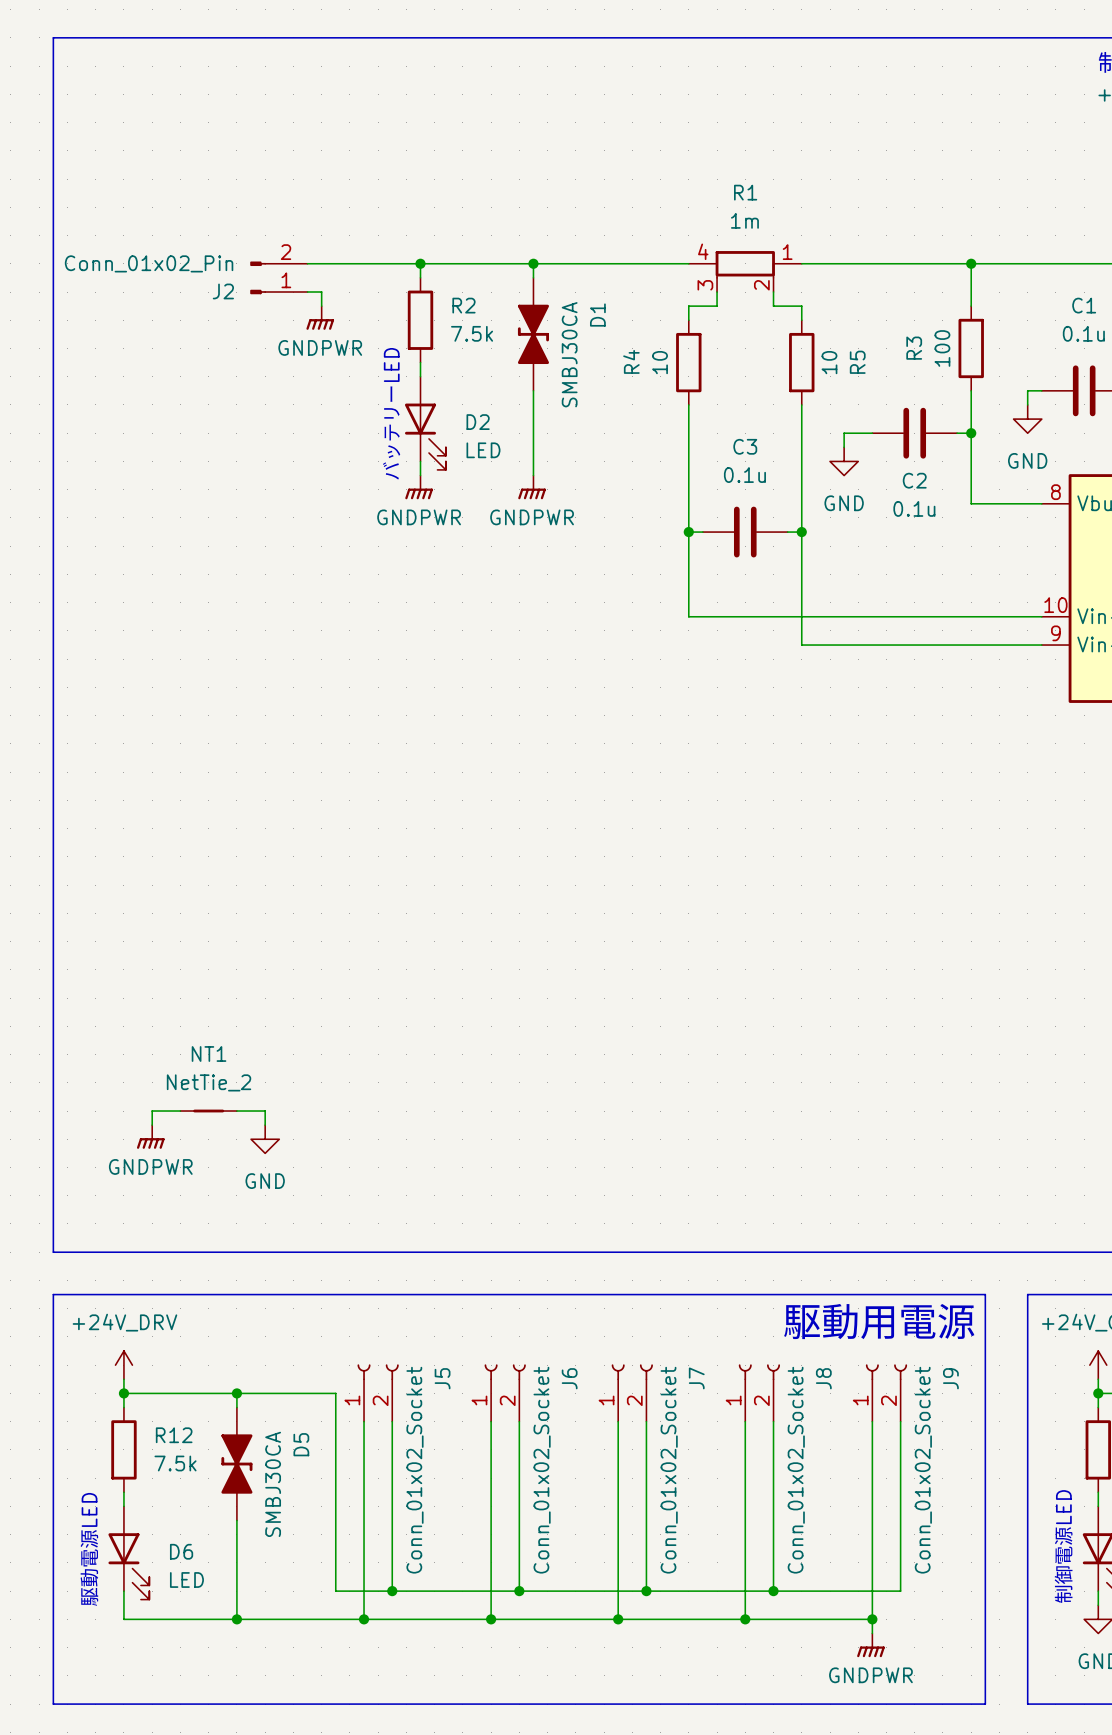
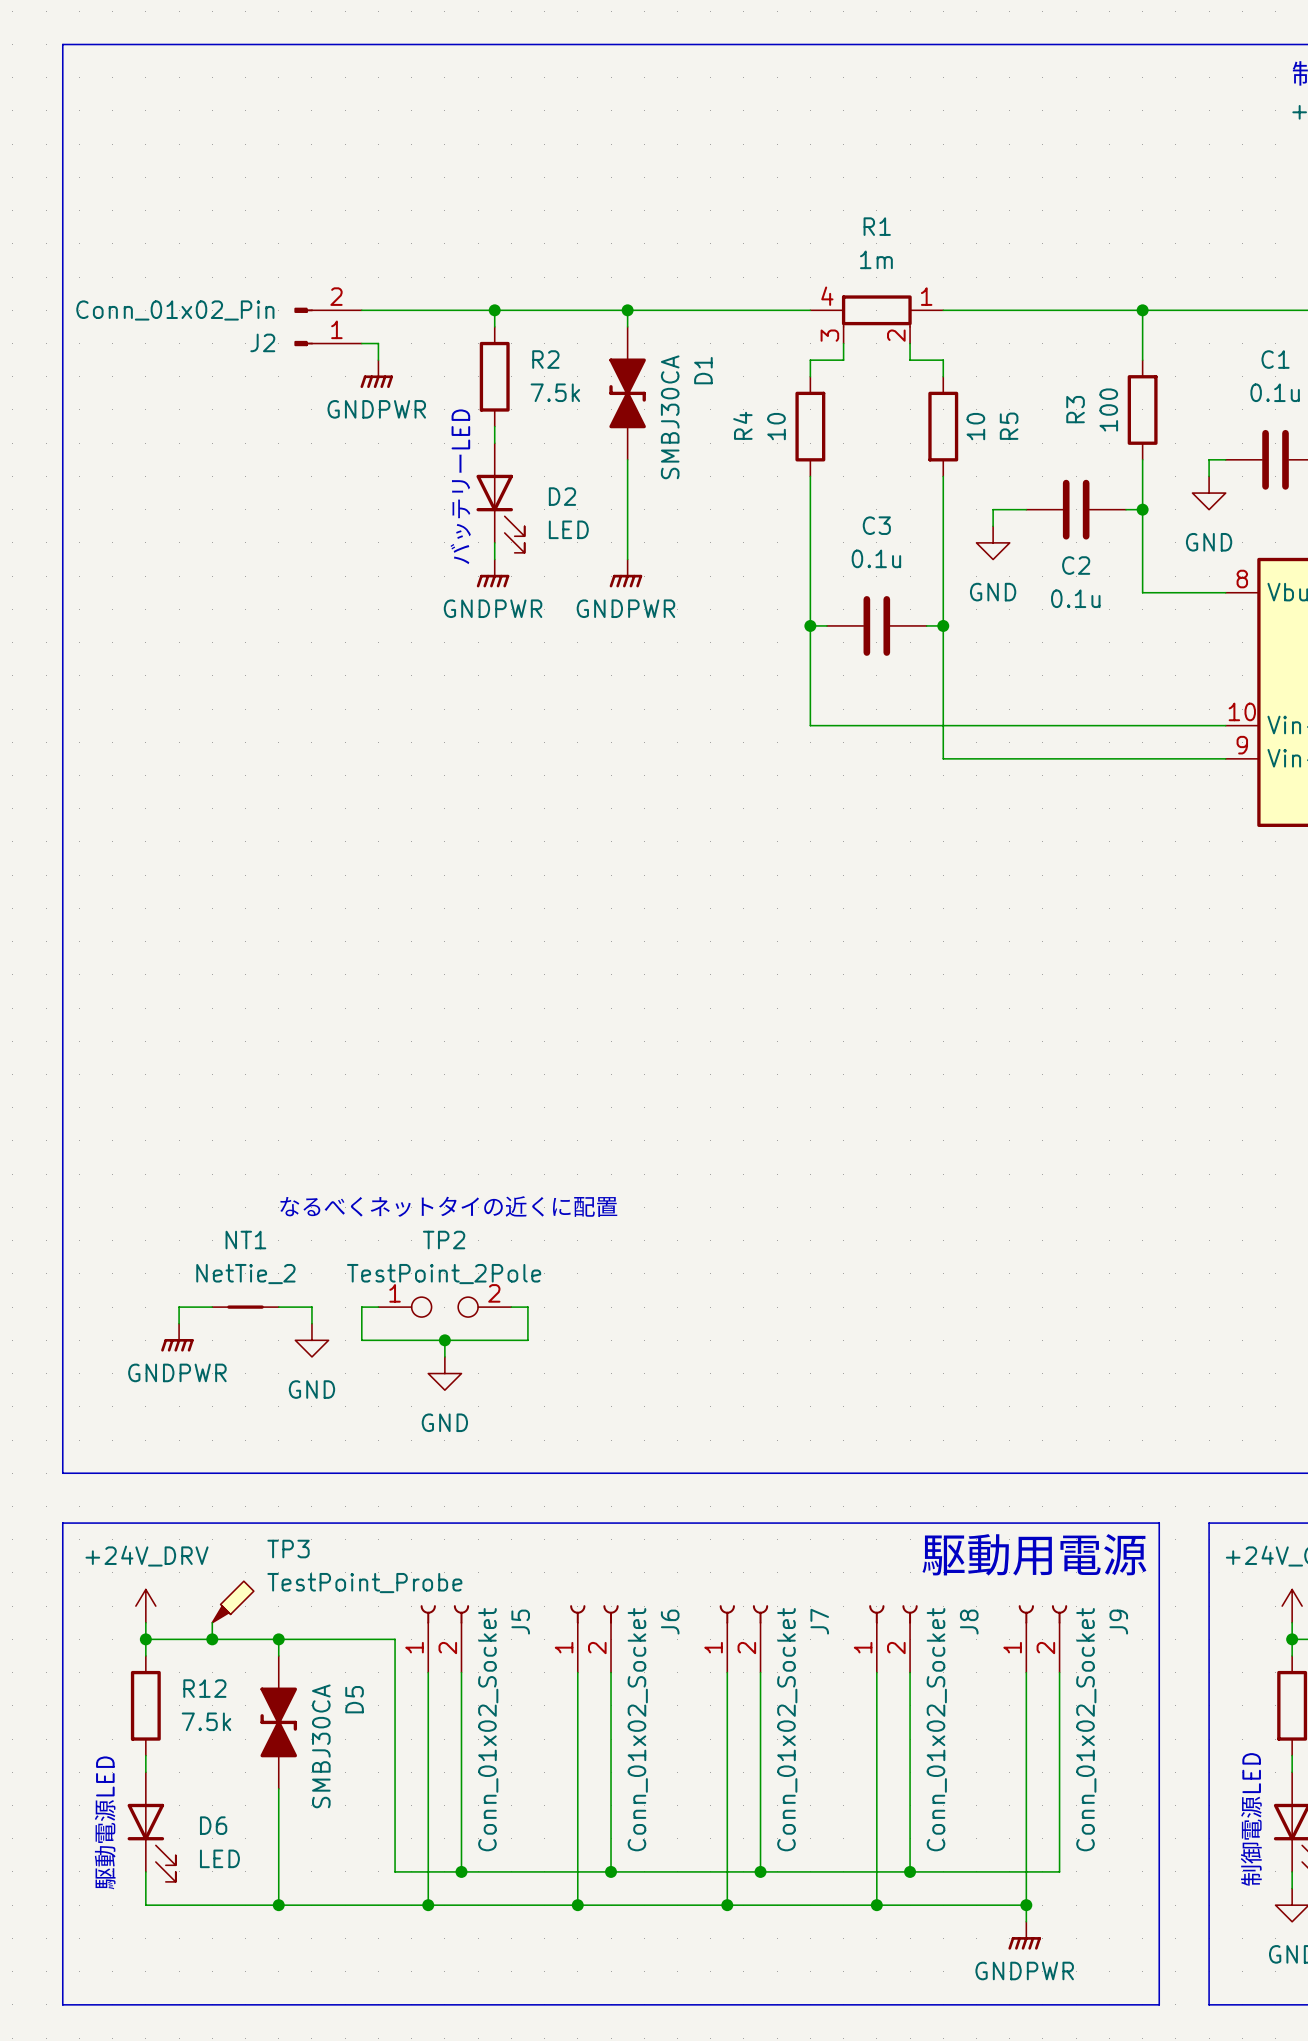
text: none -> なるべくネットタイの近くに配置 (448, 1206)
wire: none -> (378, 1307) (361, 1307) (361, 1340) (527, 1340) (527, 1307) (511, 1307)
TP2: none -> TestPoint_2Pole (444, 1307)
wire: none -> (444, 1340) (444, 1356)
junction: none -> (444, 1340)
power symbol: none -> GND (444, 1373)
TP3: none -> TestPoint_Probe (233, 1601)
wire: none -> (212, 1622) (212, 1639)
junction: none -> (212, 1639)

